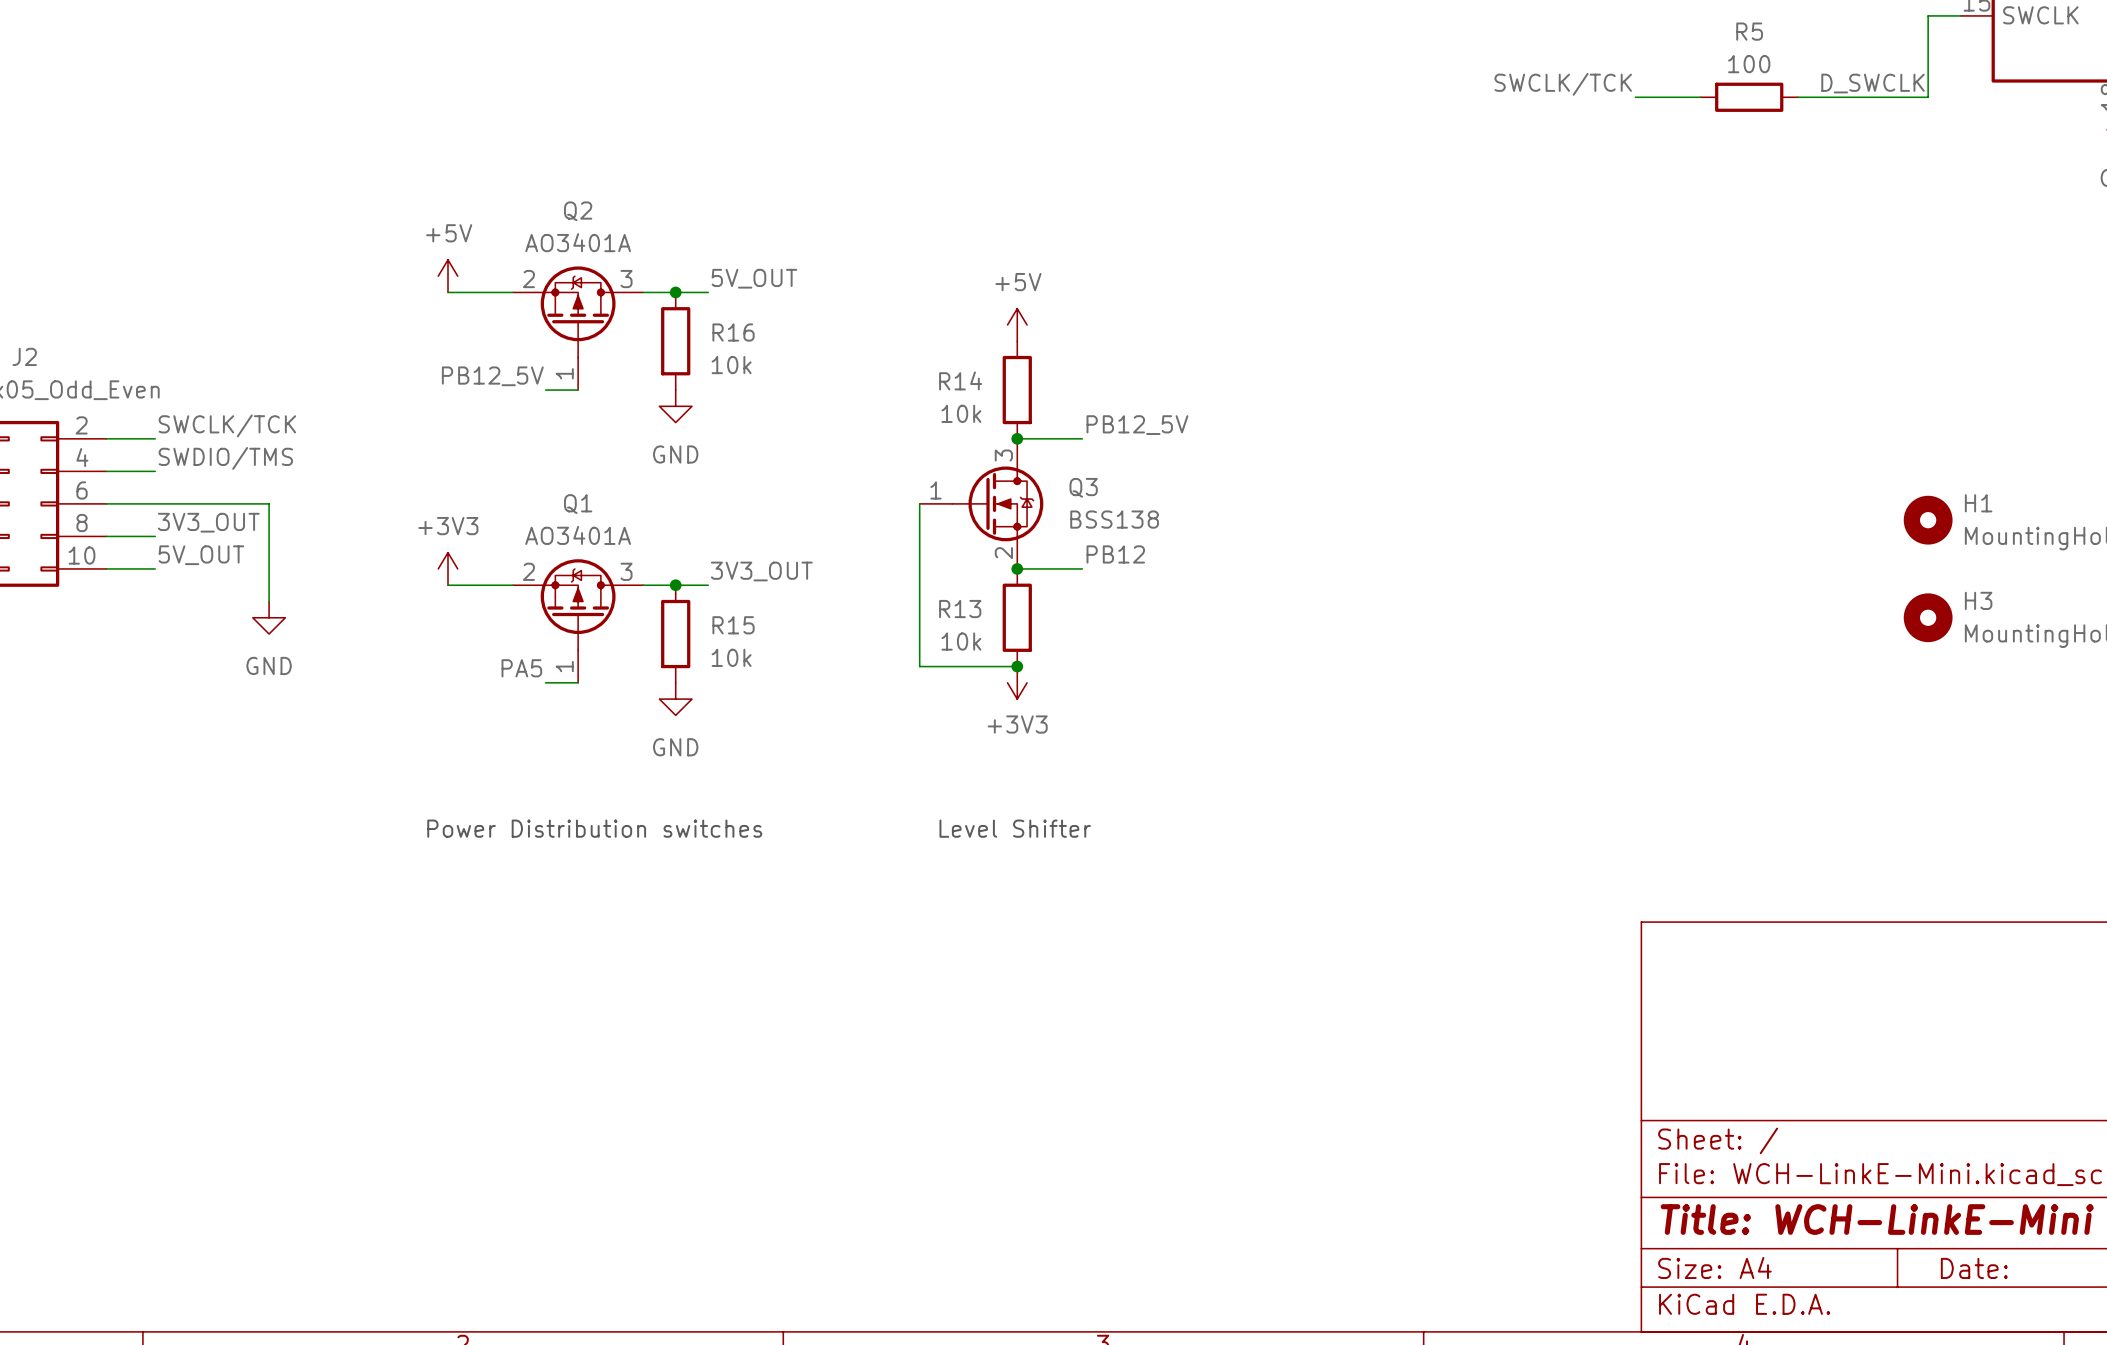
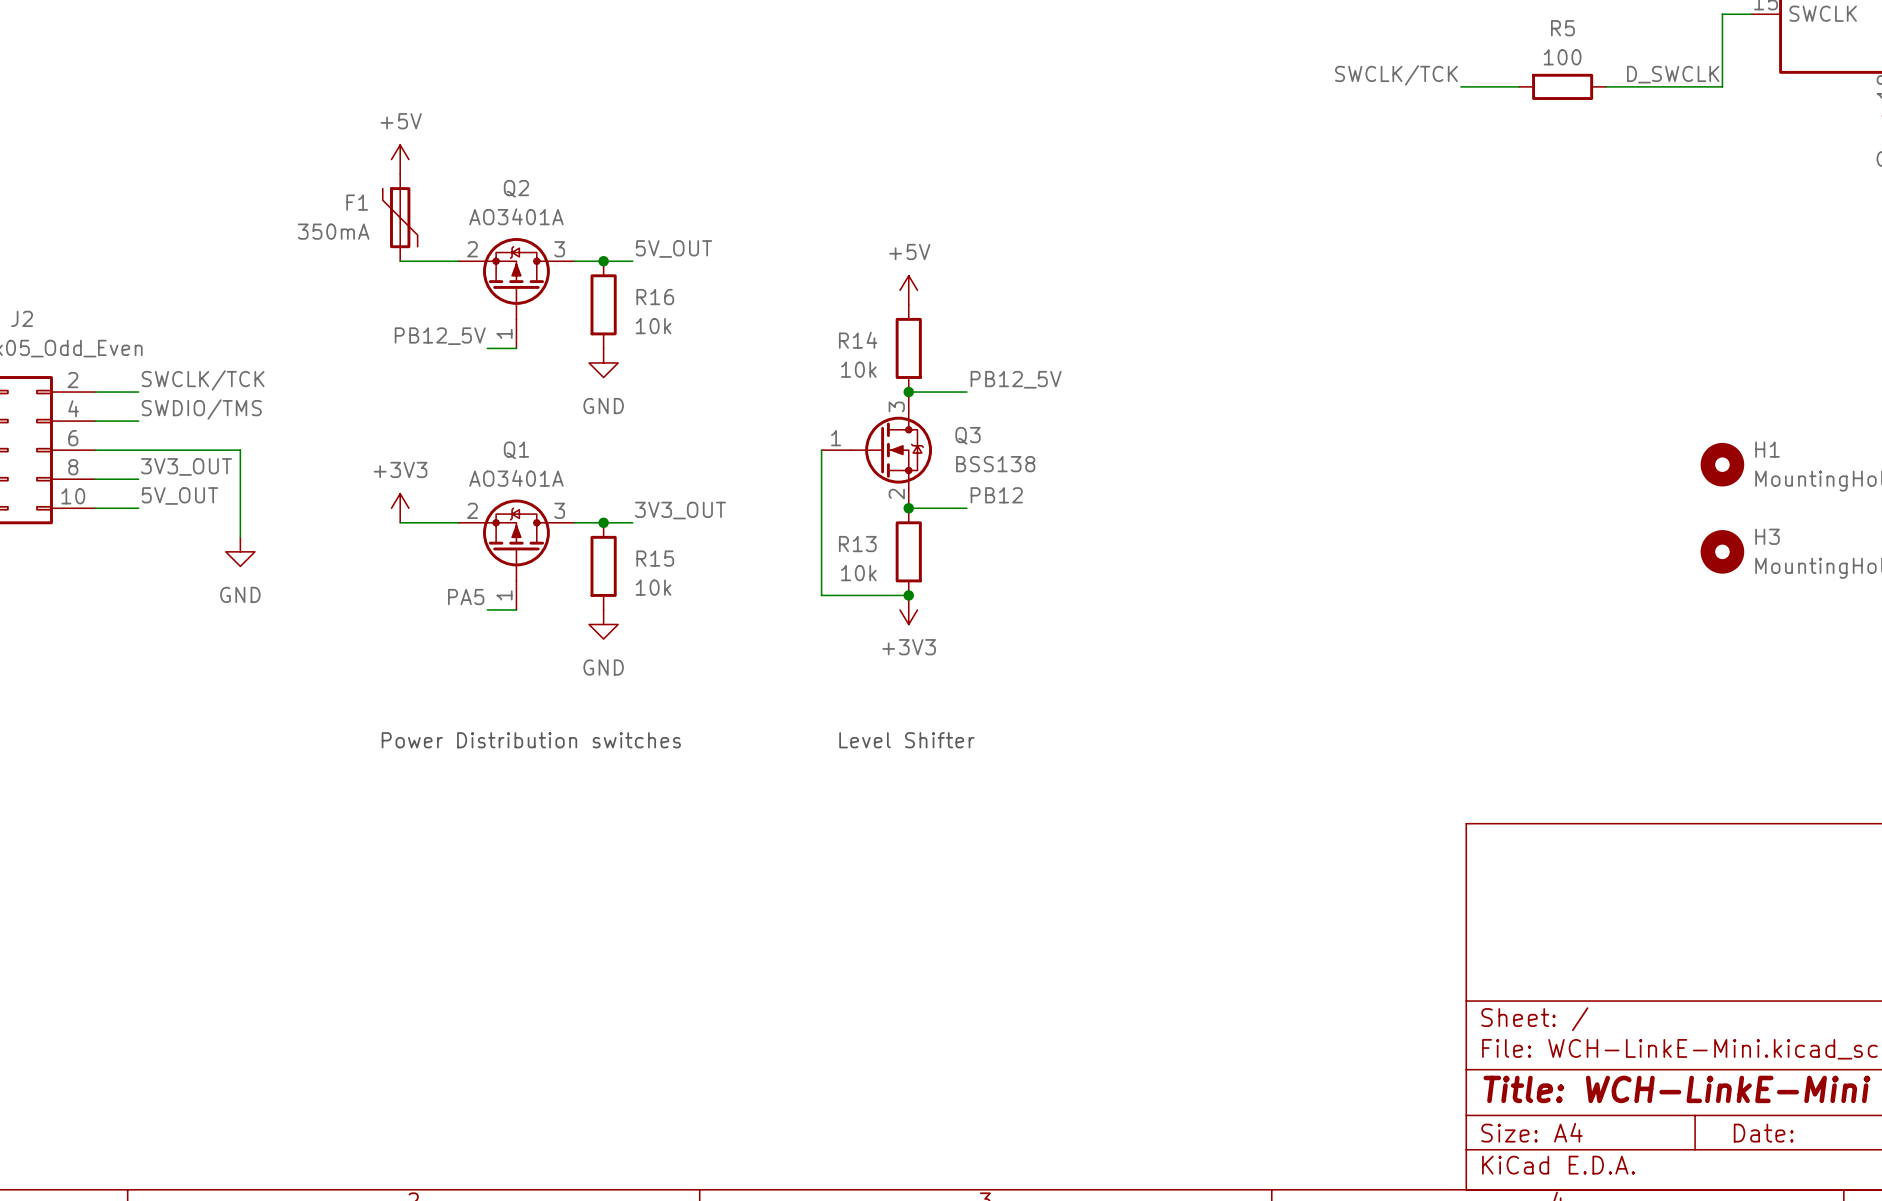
F1: none -> 350mA (400, 217)
power symbol position: +5V (447, 276) -> +5V (400, 159)

